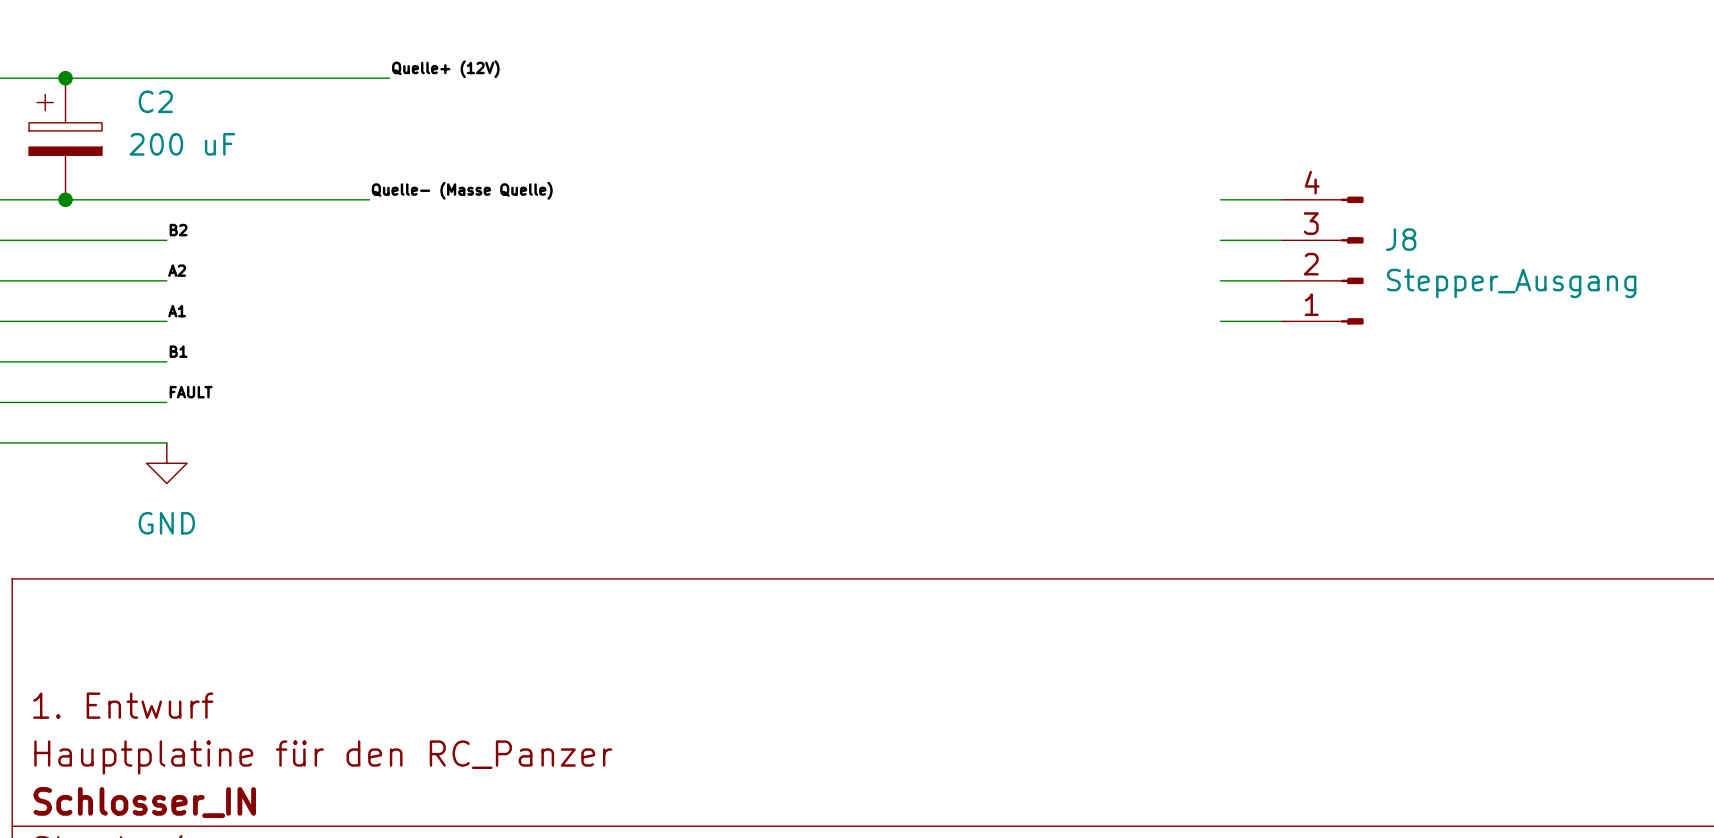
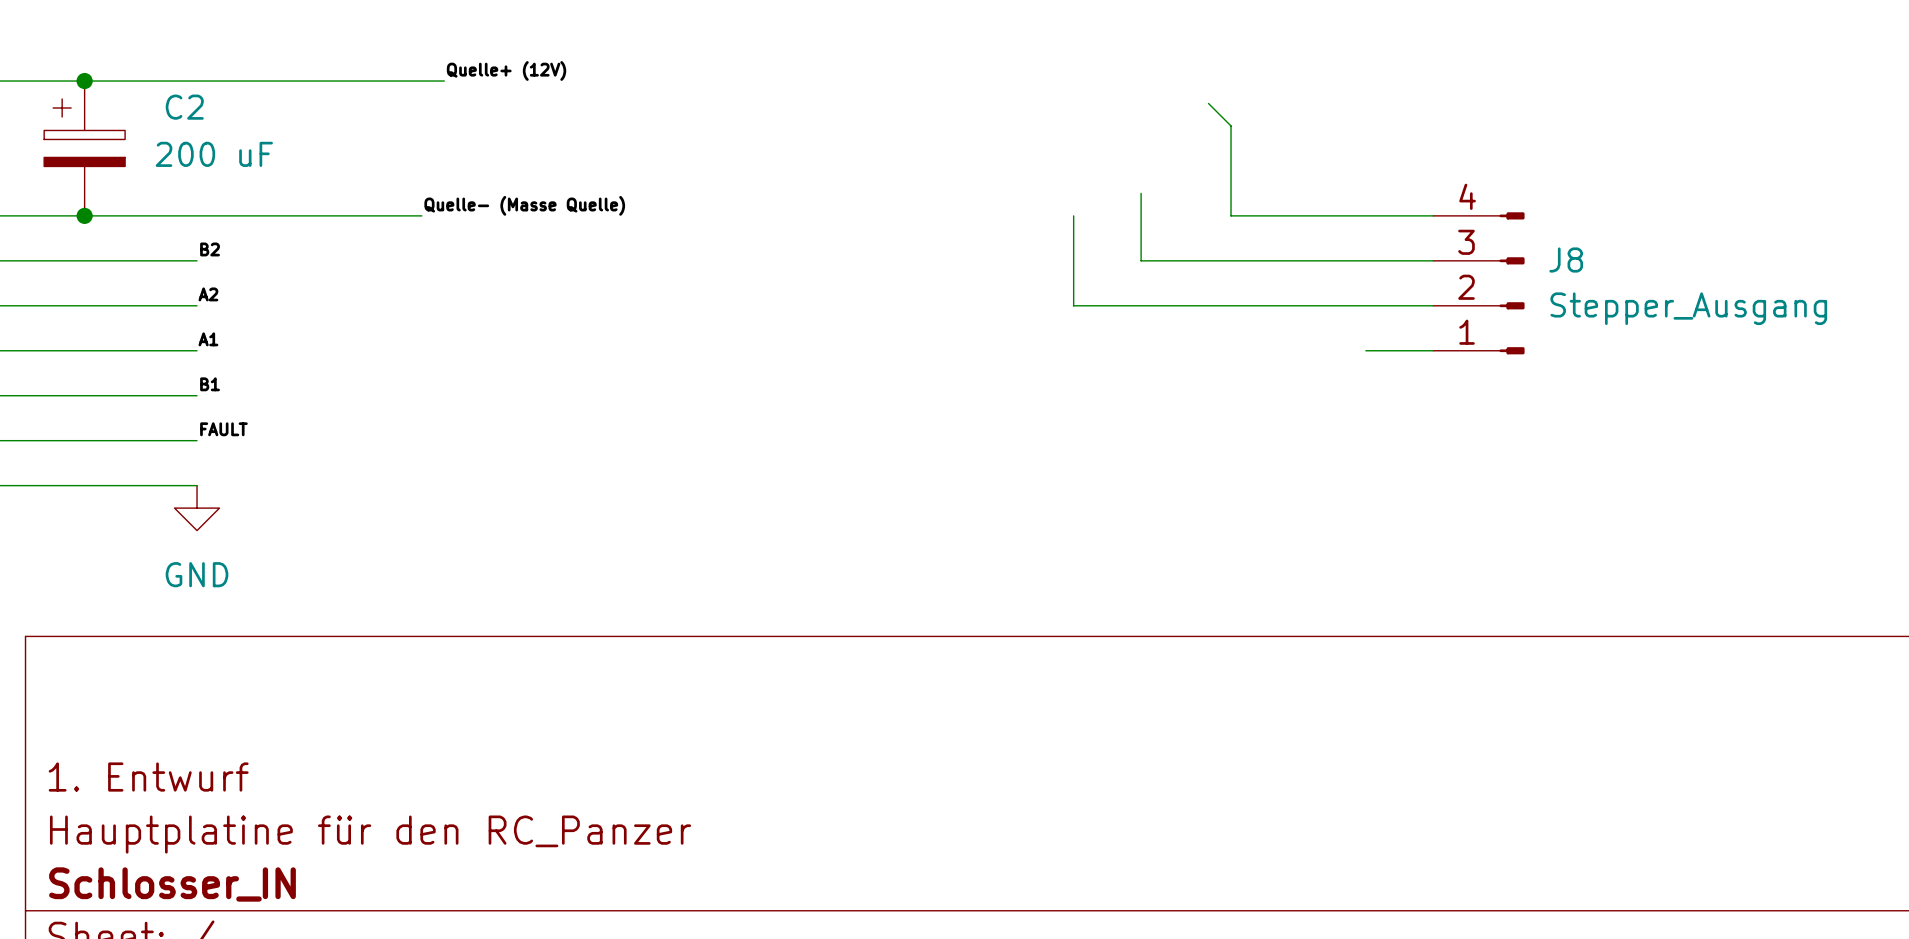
wire: none -> (1208, 103) (1231, 125) (1231, 215) (1365, 215)
wire: none -> (1141, 193) (1141, 260) (1365, 260)
wire: none -> (1073, 215) (1073, 305) (1365, 305)

